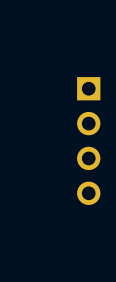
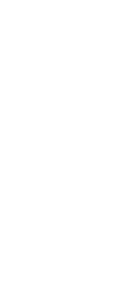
part: (88, 141) -> none

